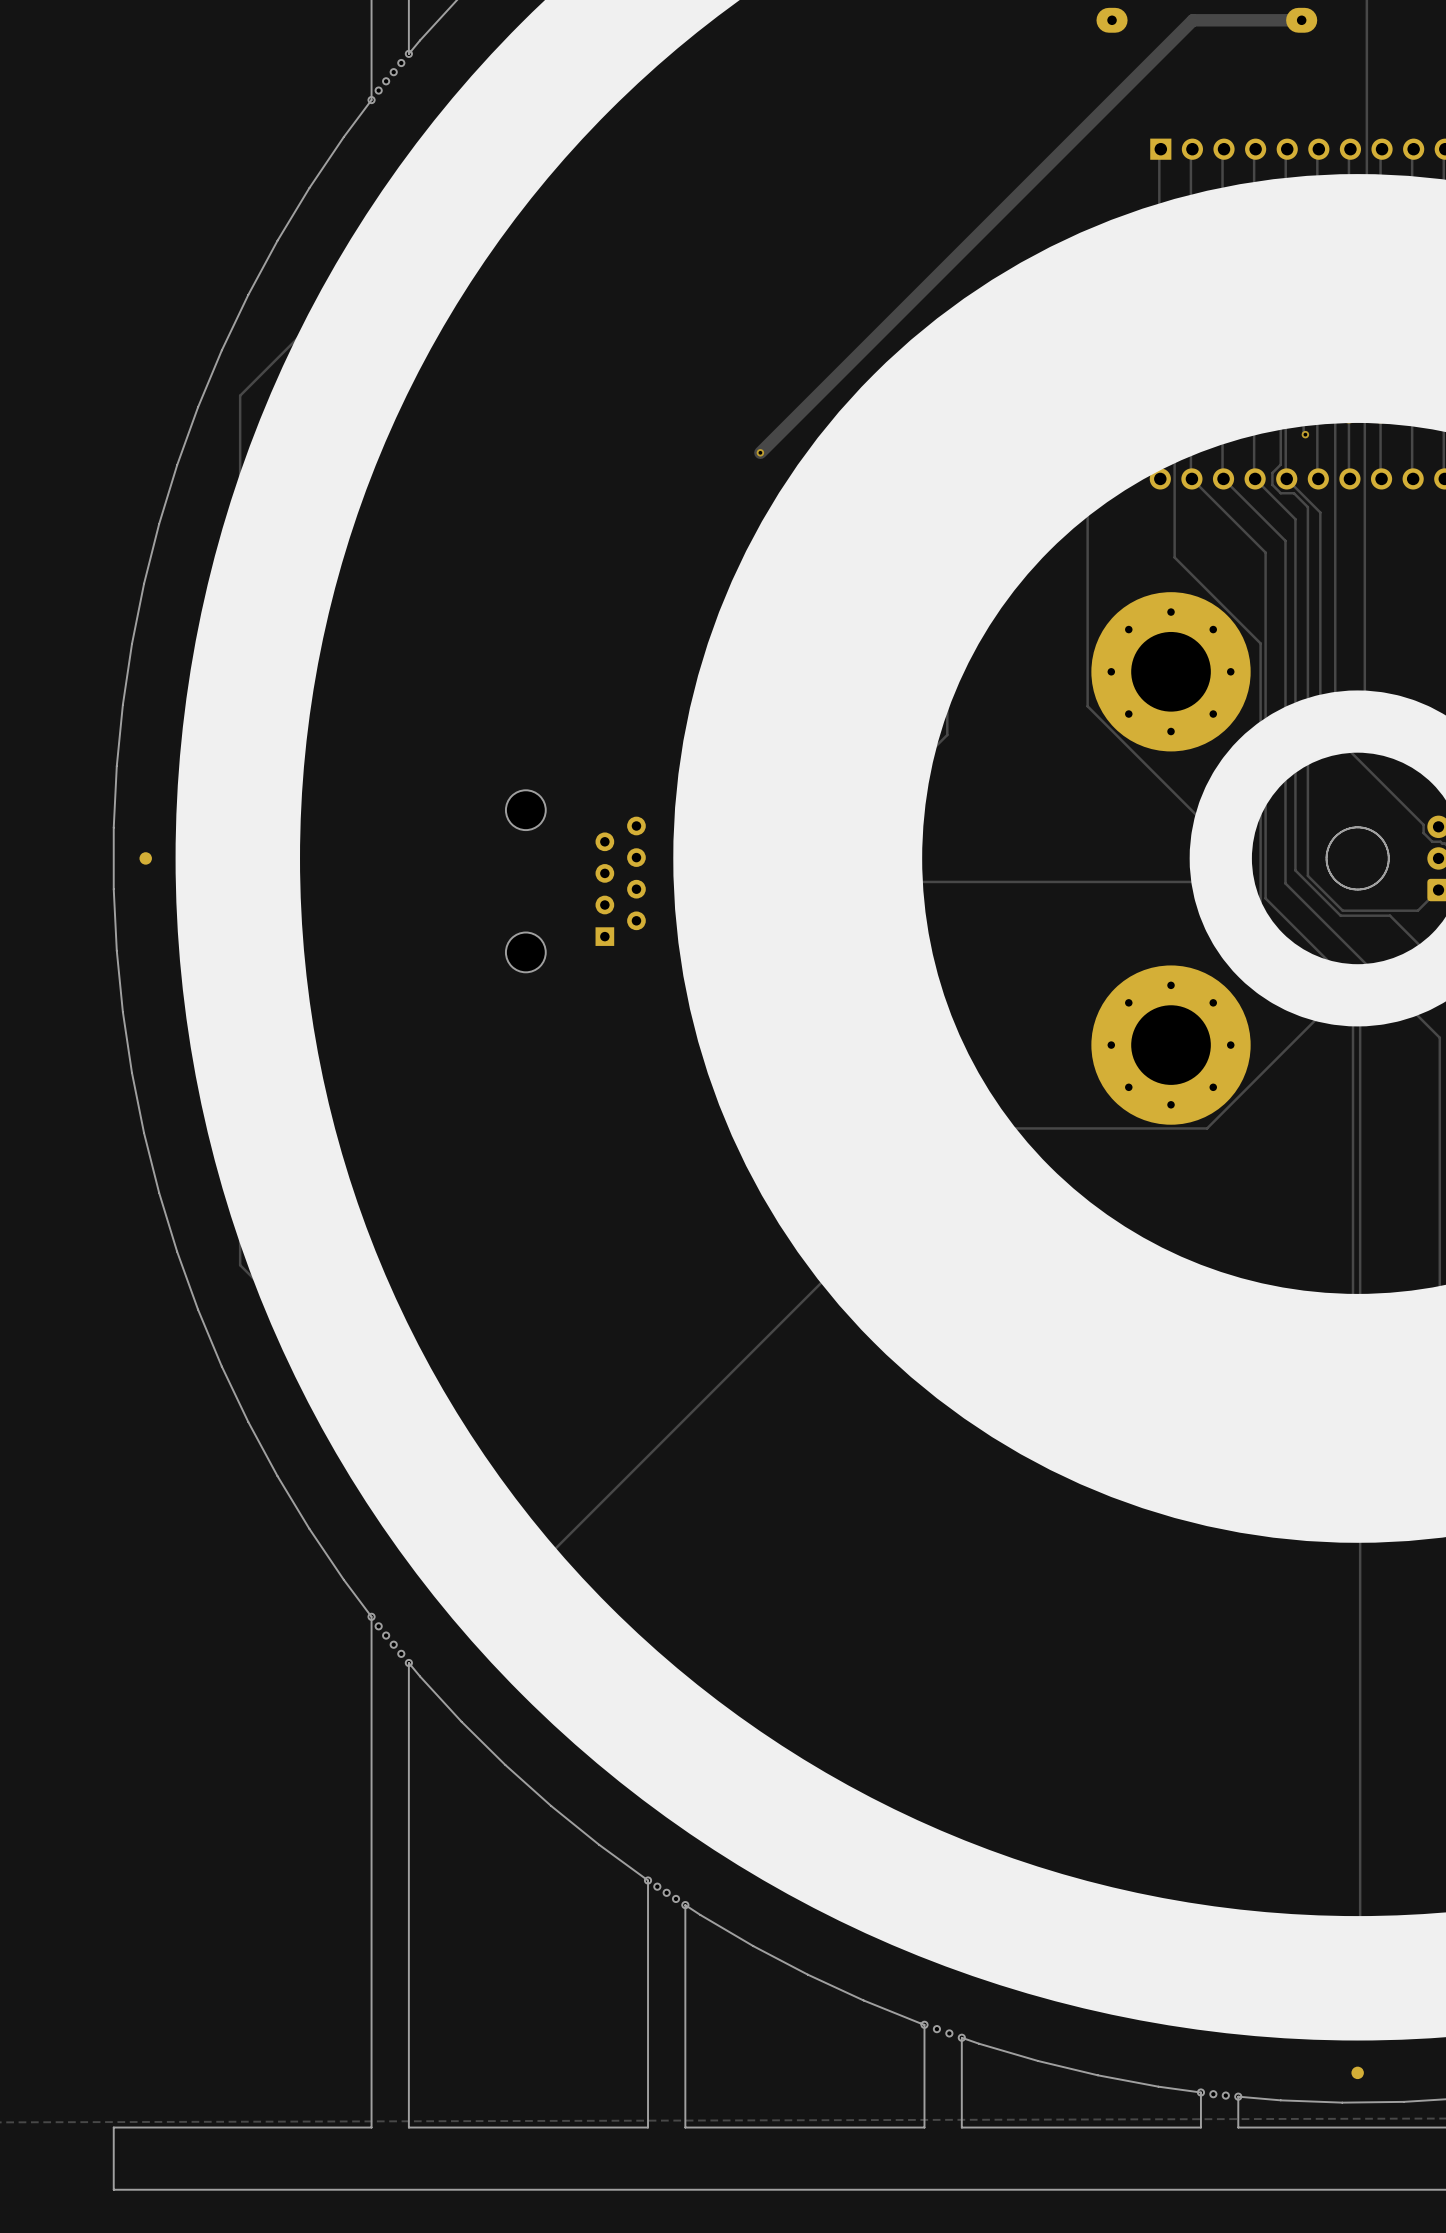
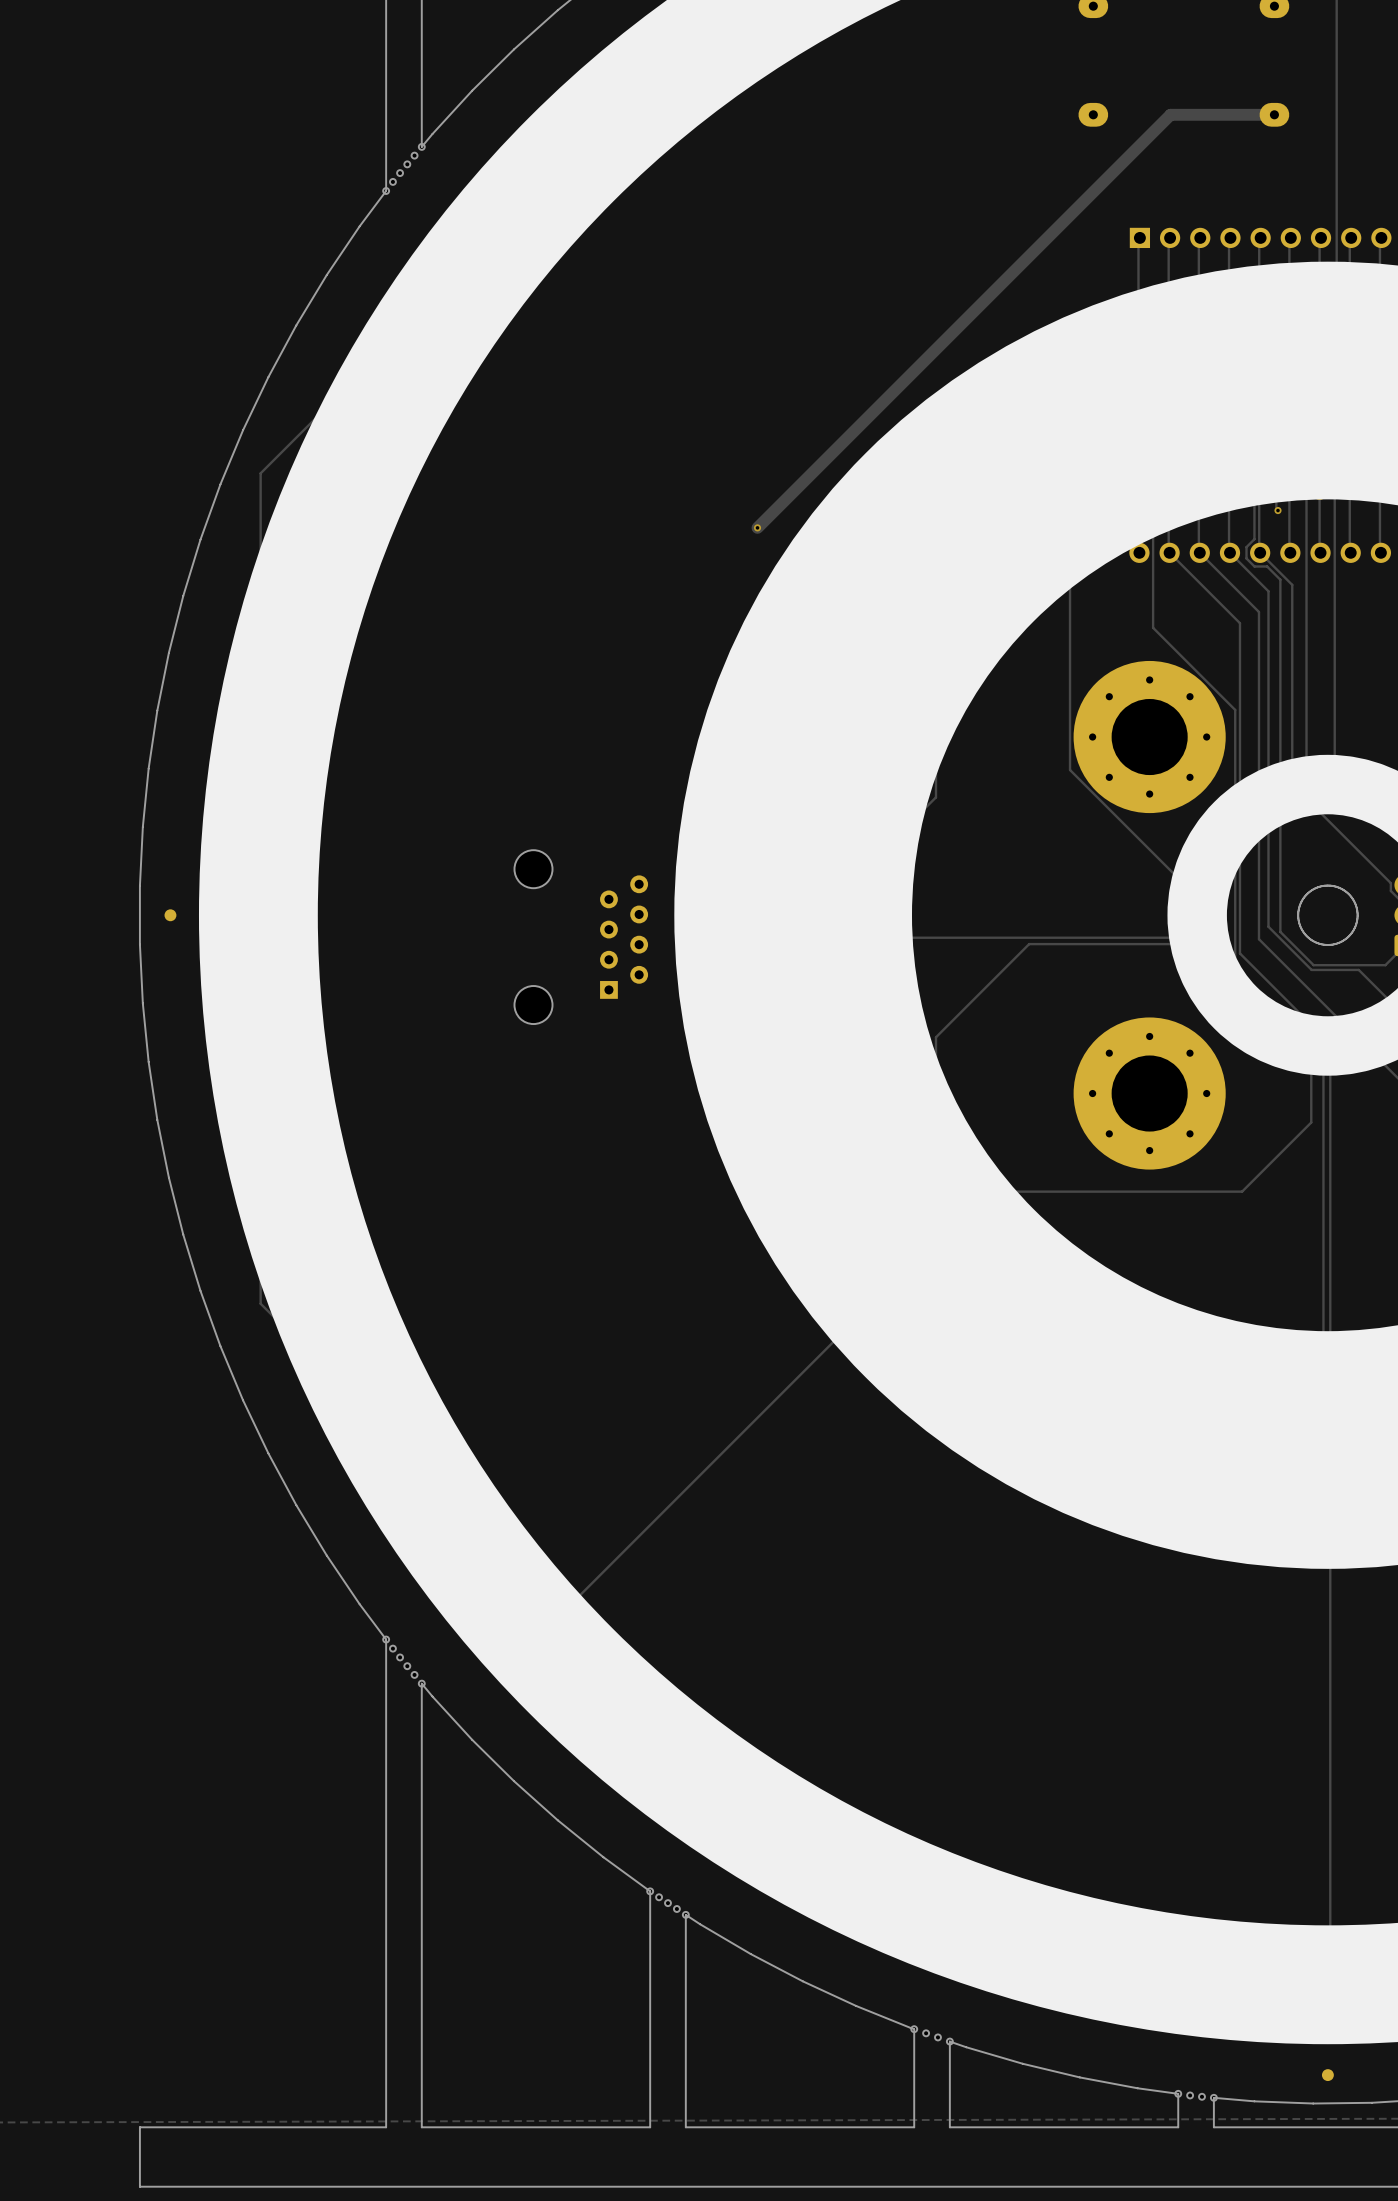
track: none -> (1203, 899) (1217, 913) (1217, 940) (1213, 944) (1029, 944) (935, 1037) (935, 1218)
track: (1340, 995) (1207, 1128) (975, 1128) (517, 1586) -> (1311, 1045) (1311, 1122) (1242, 1191) (983, 1191) (564, 1610) (525, 1610)

